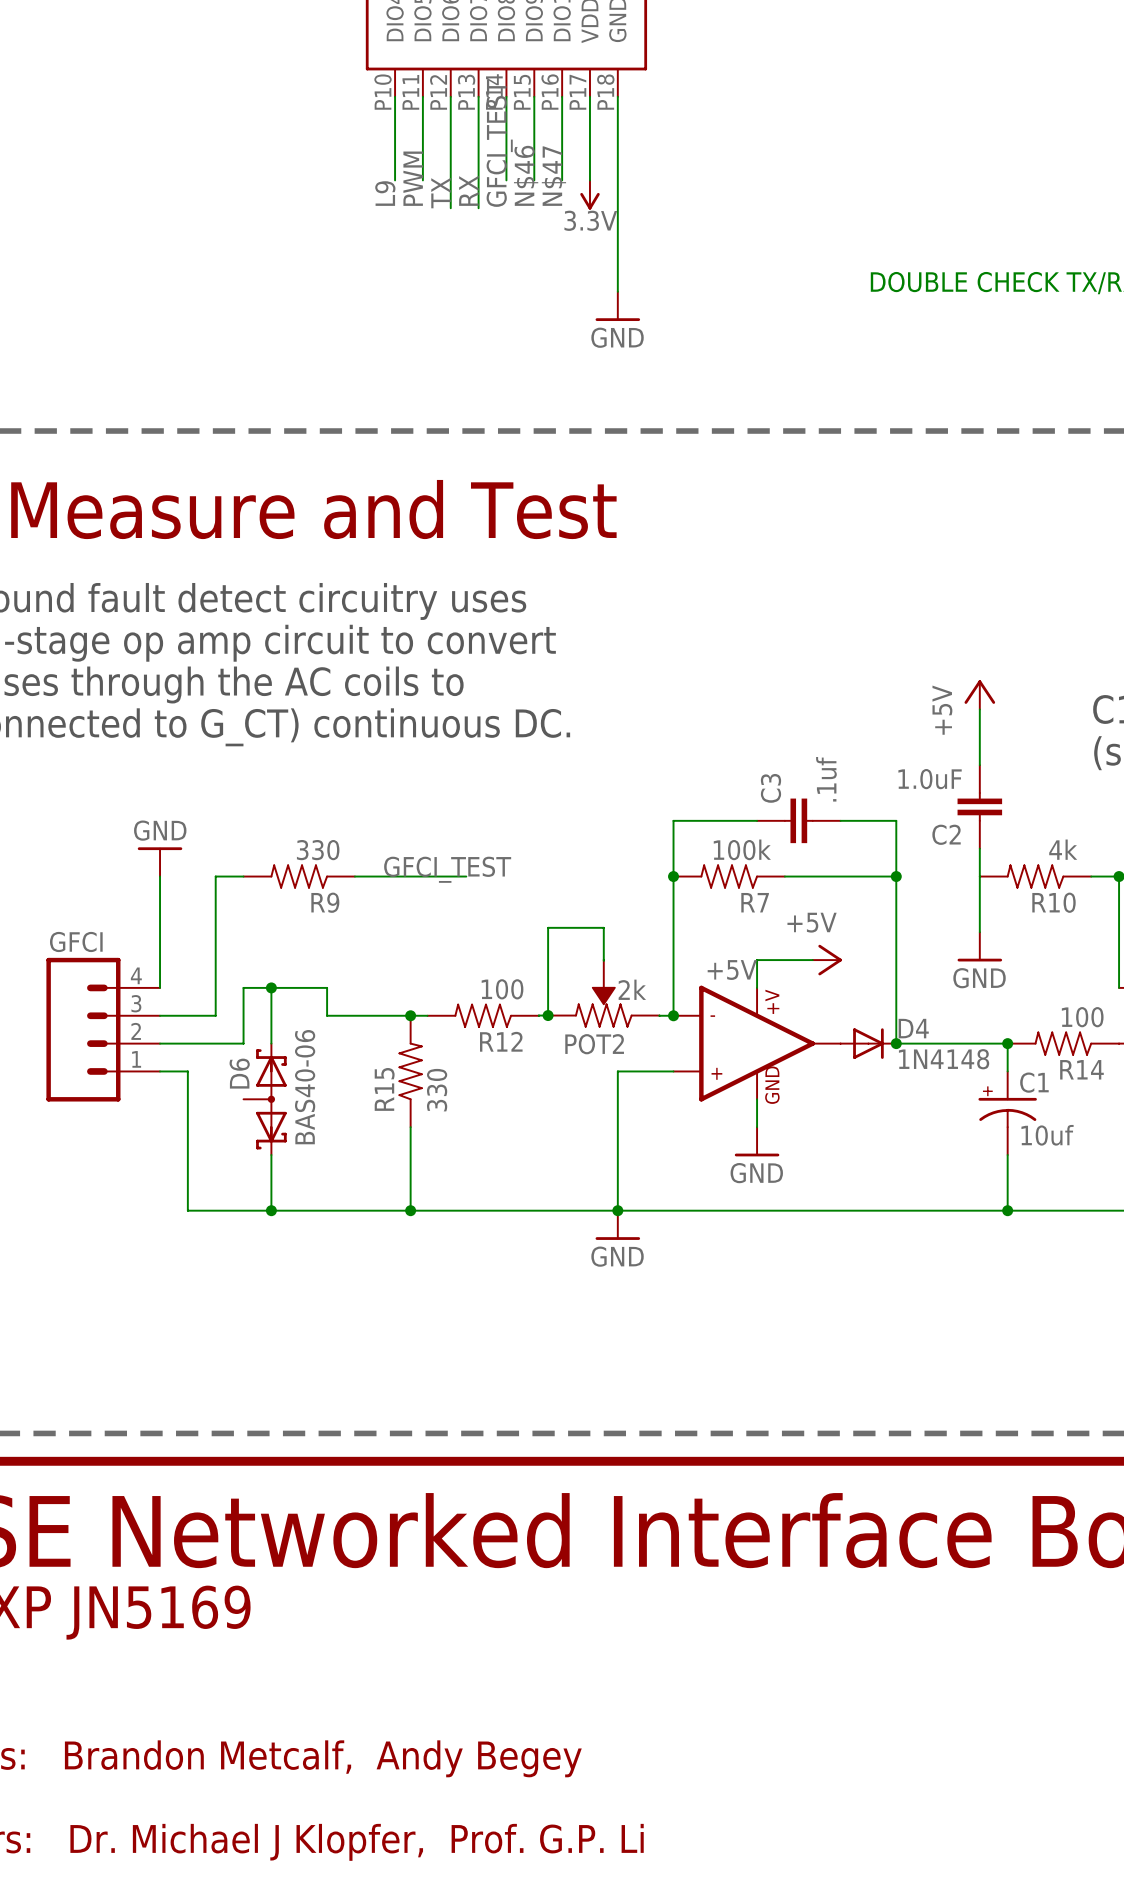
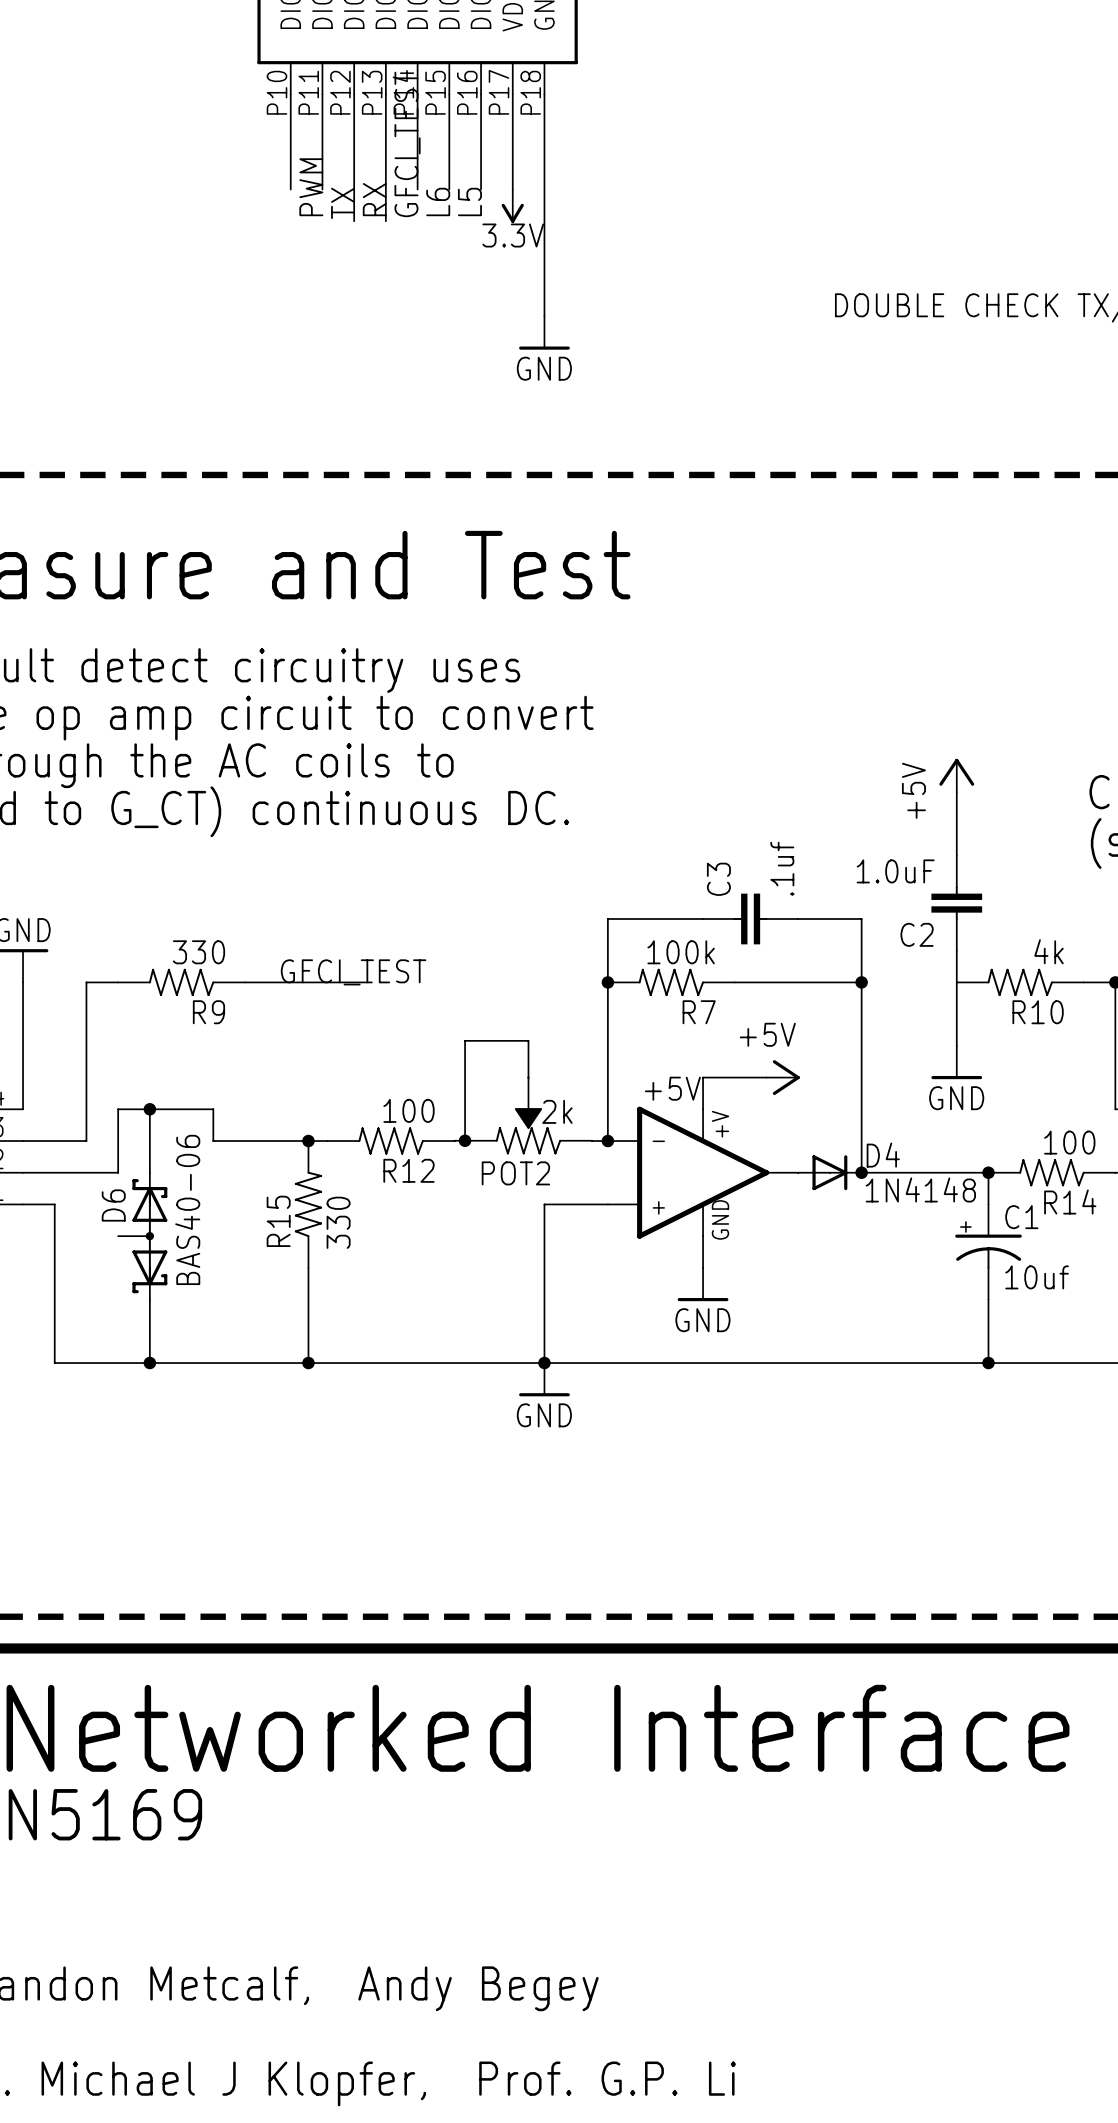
label: N$46 (526, 175) -> L6 (438, 201)
label: N$47 (553, 176) -> L5 (469, 201)
label: L9 (385, 193) -> none

